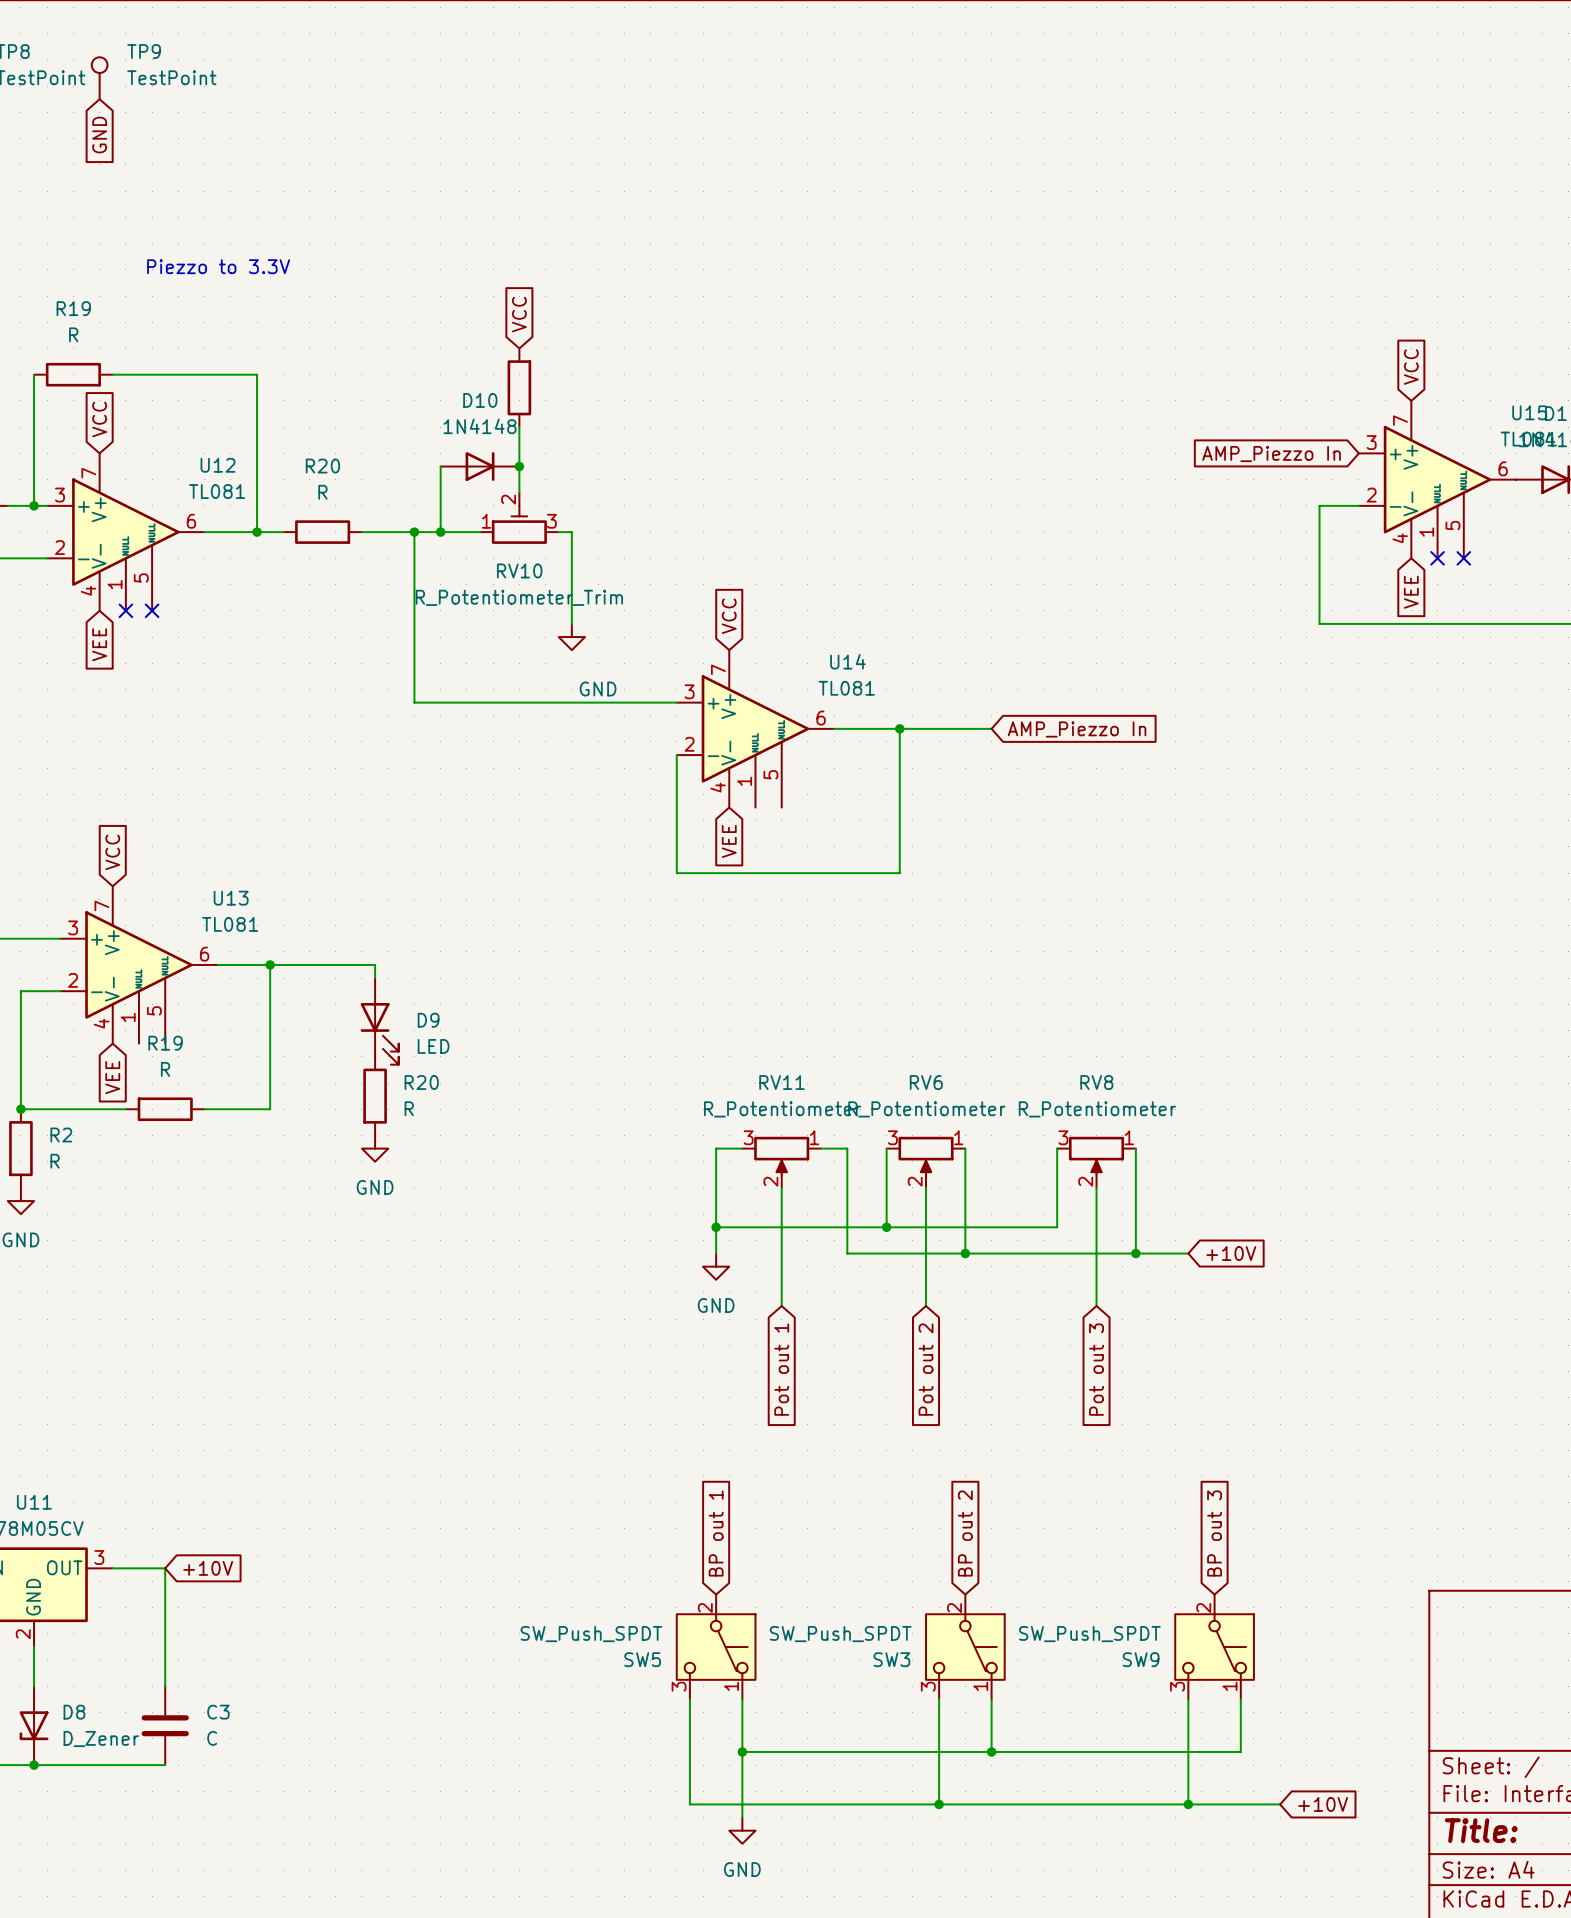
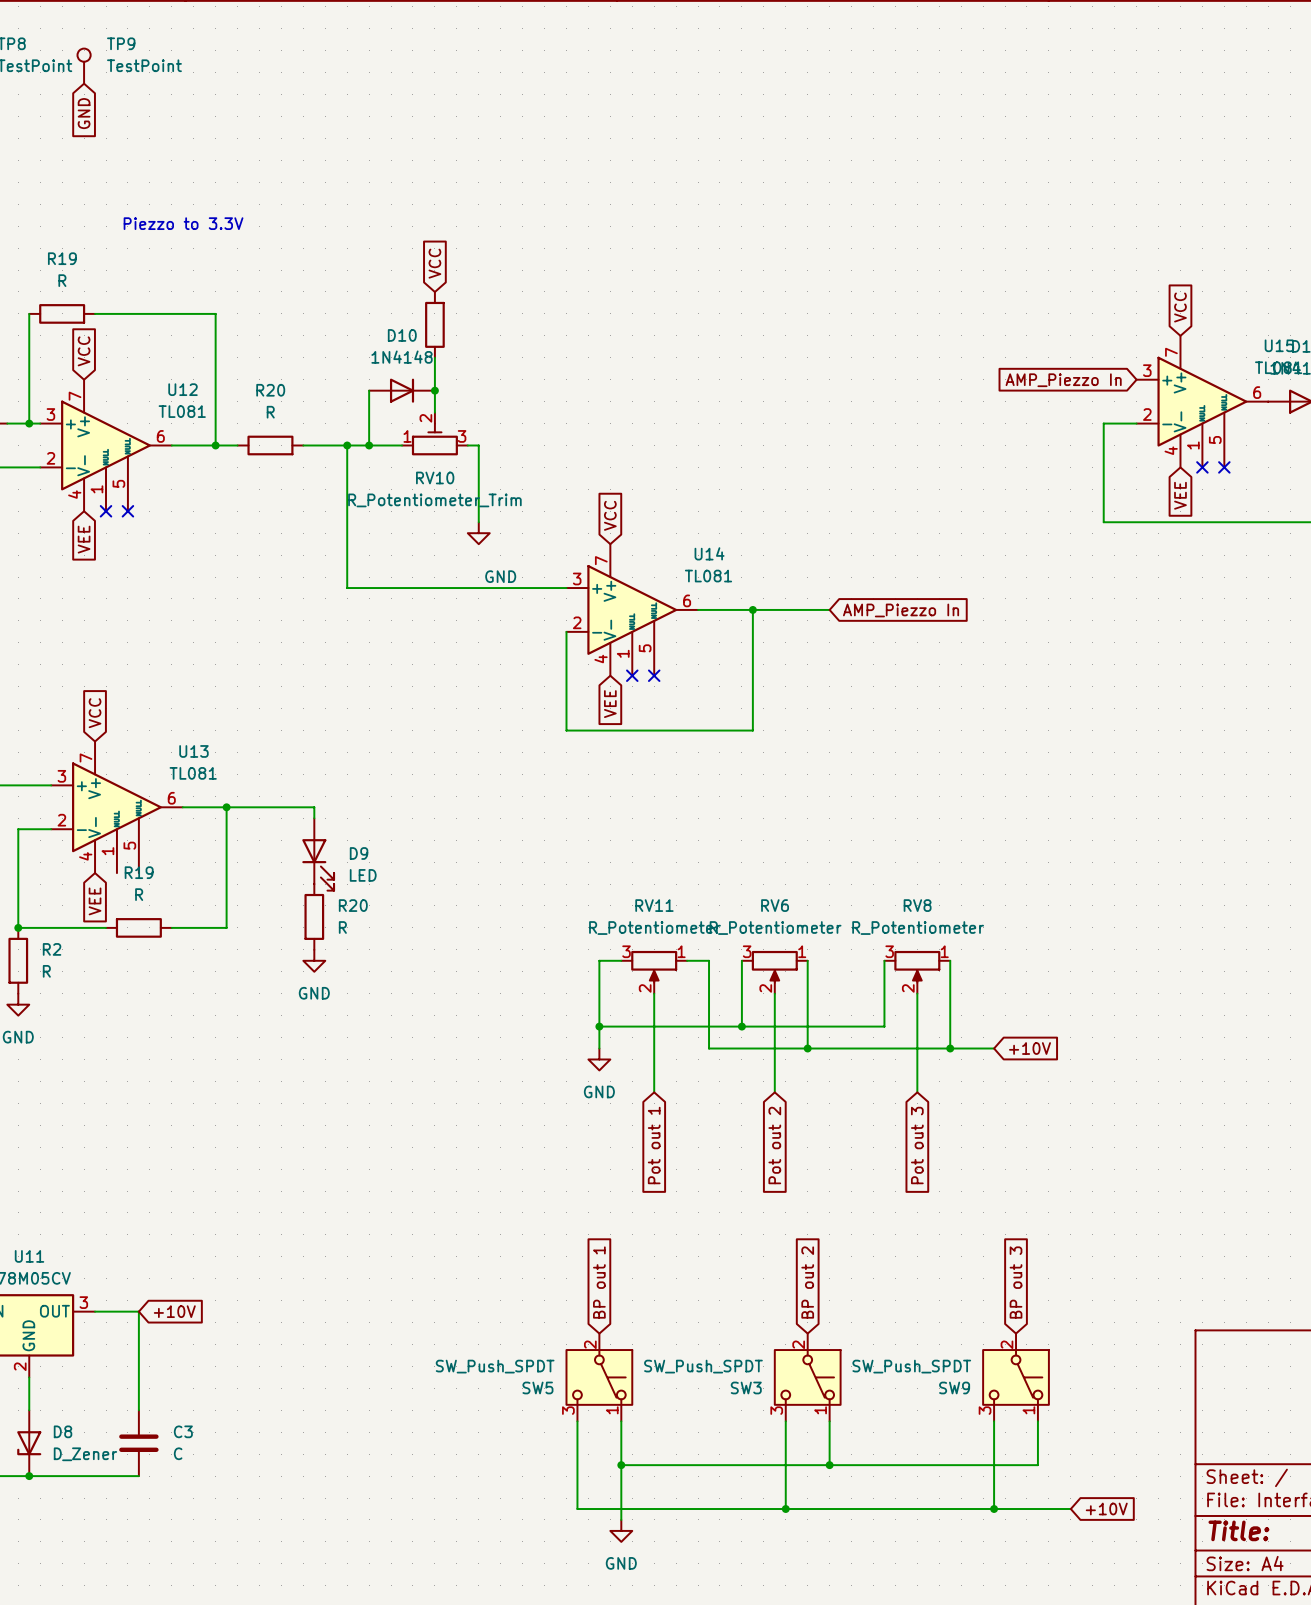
no-connect mark: none -> (632, 675)
no-connect mark: none -> (654, 675)

